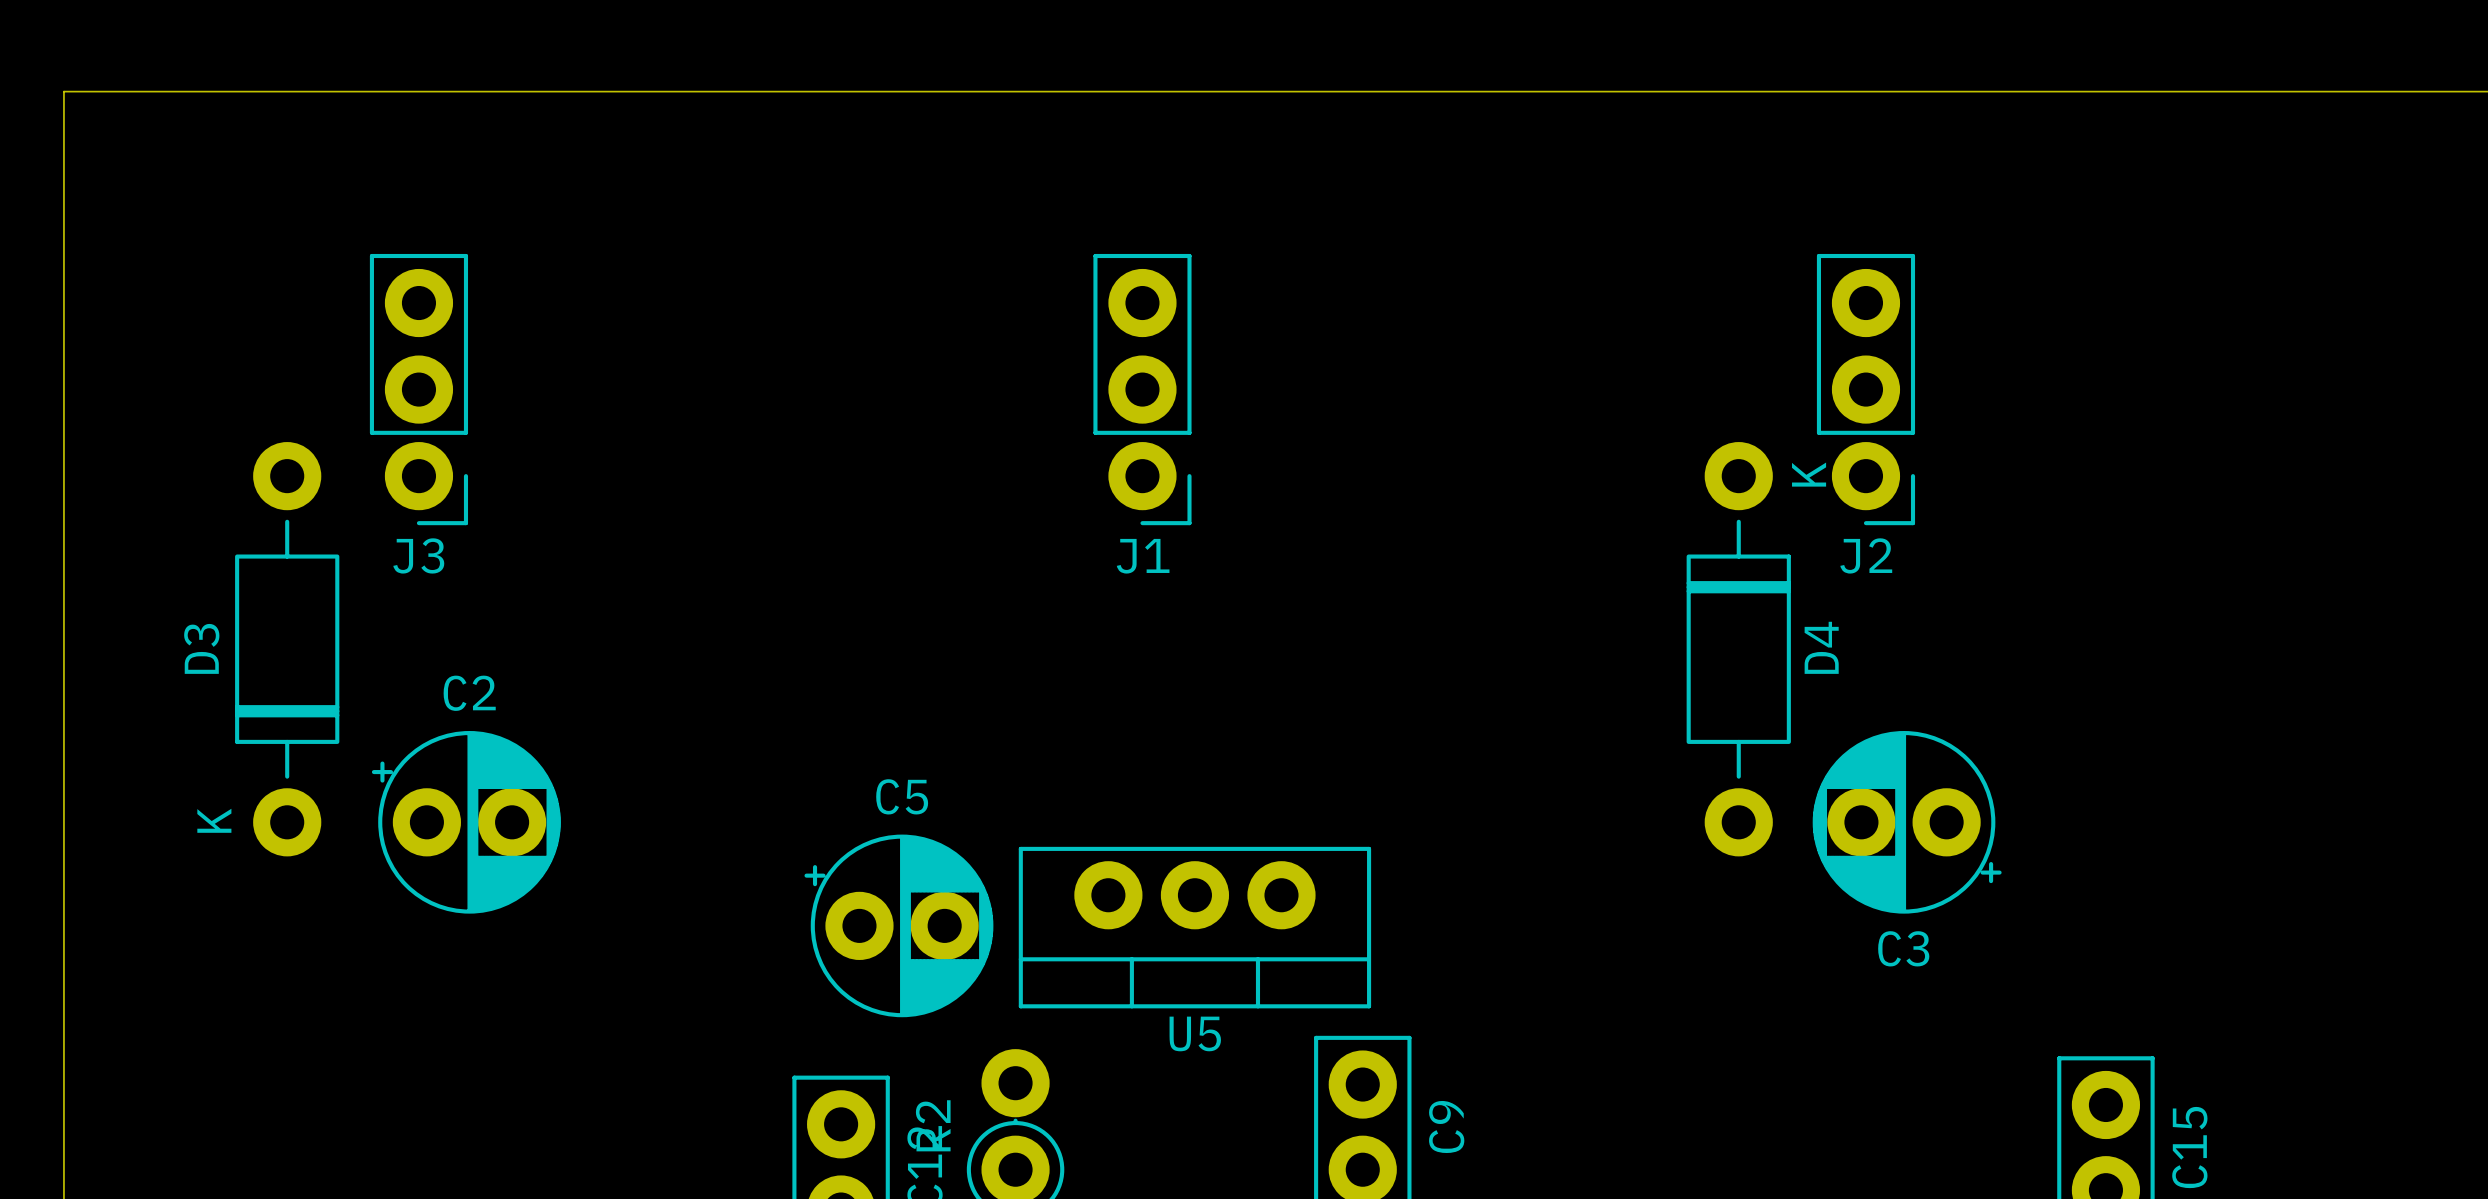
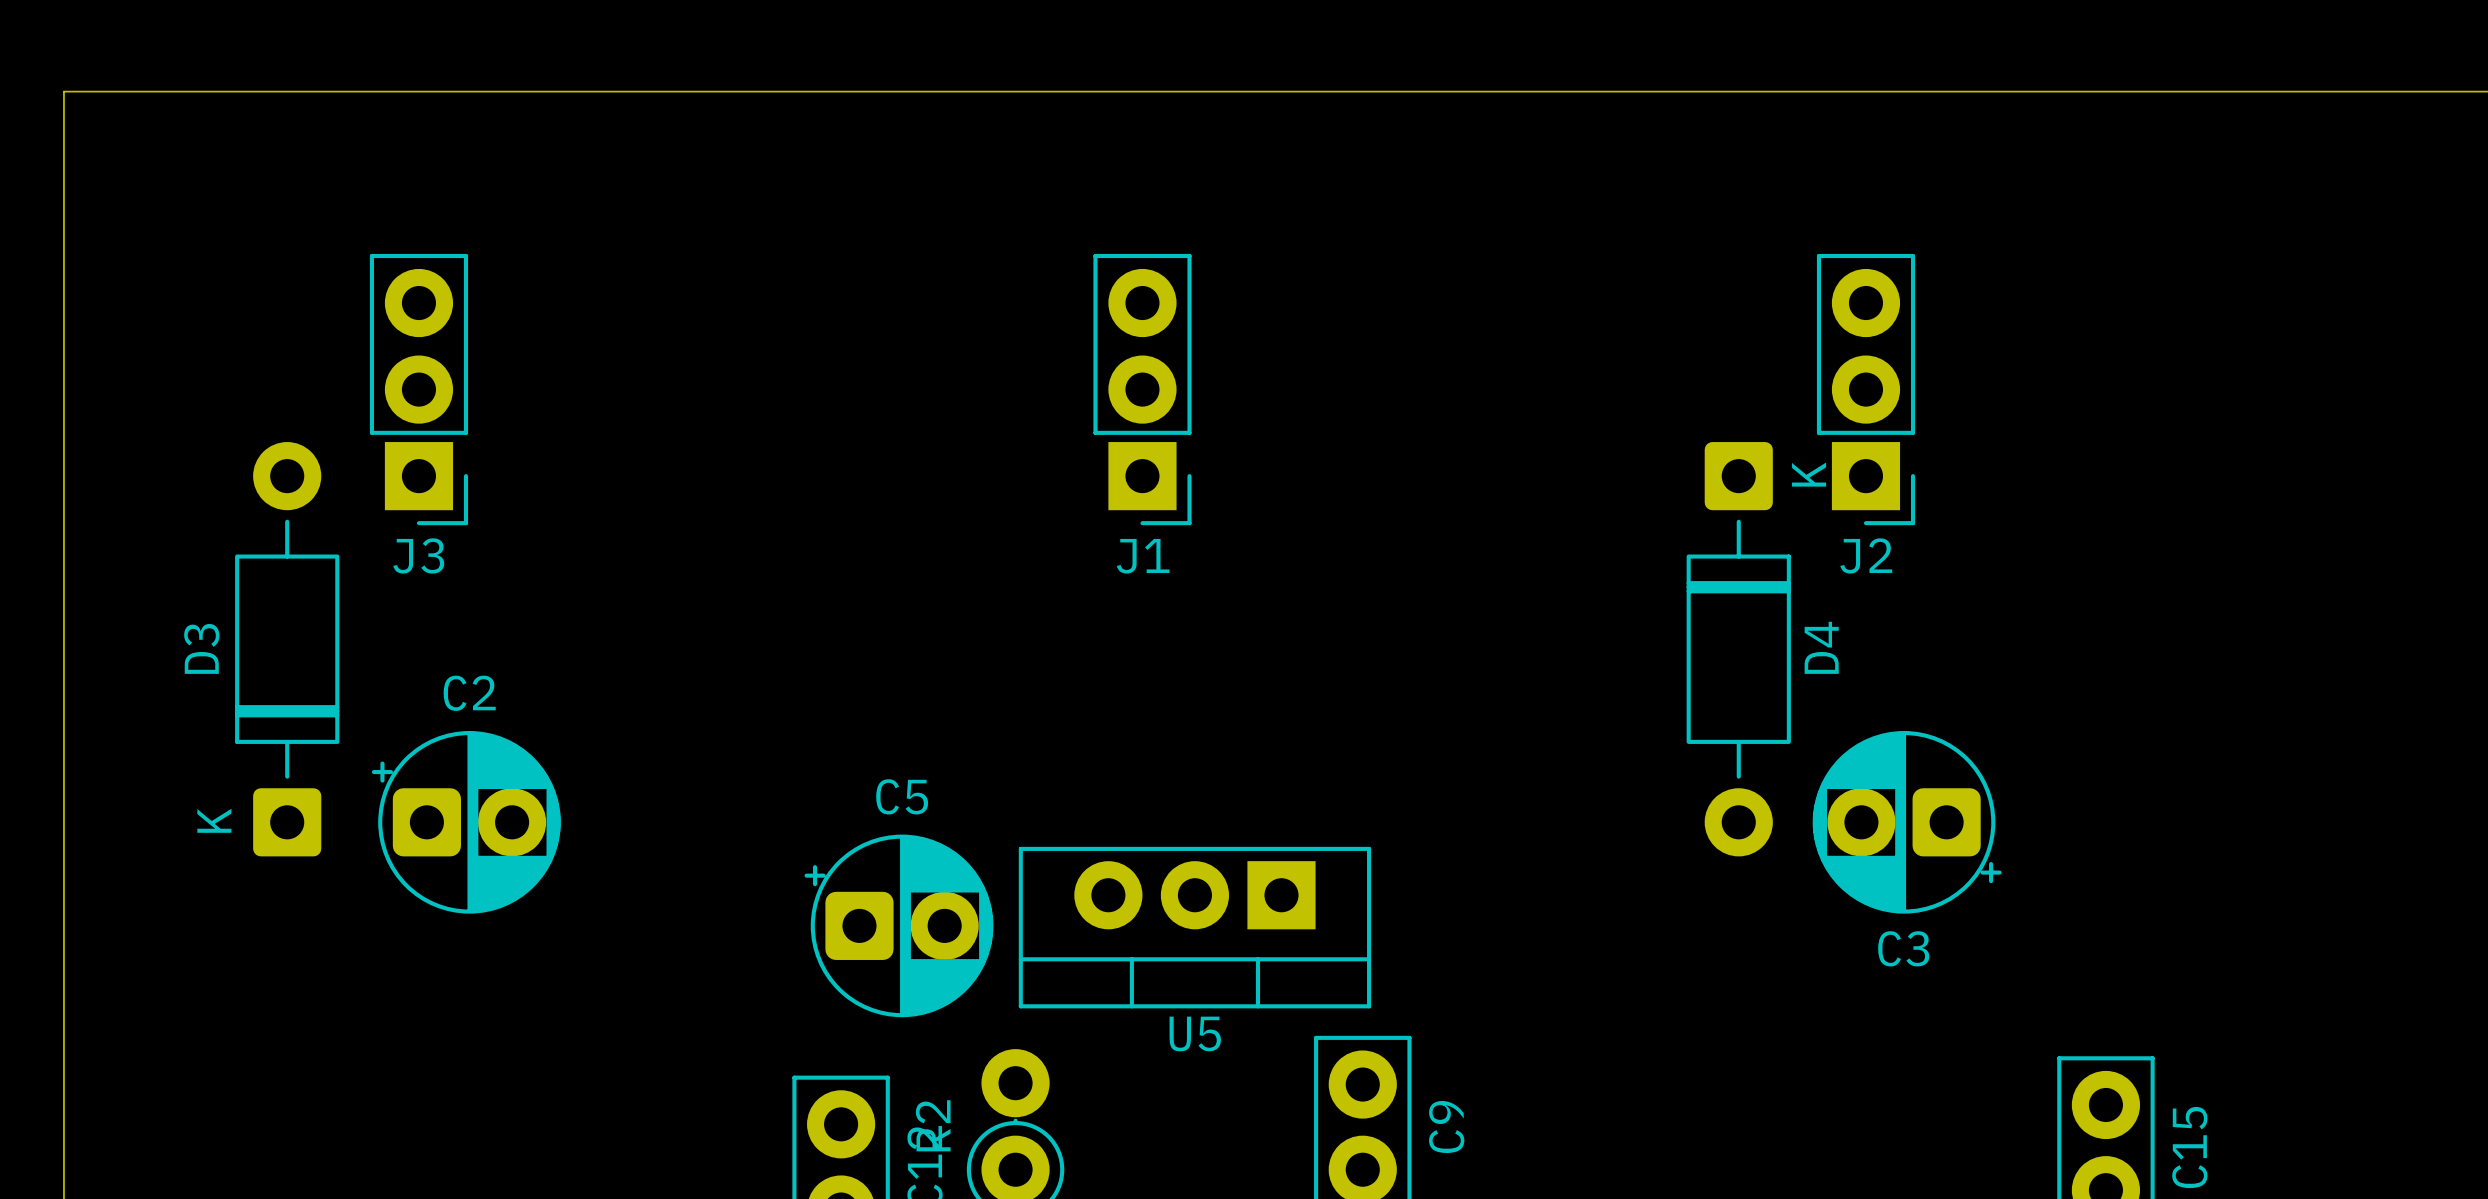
J3 footprint: [369, 253, 469, 526] -> [369, 253, 469, 526]
J1 footprint: [1093, 253, 1192, 526] -> [1093, 253, 1192, 526]
J2 footprint: [1816, 253, 1916, 526] -> [1816, 253, 1916, 526]
D3 footprint: [235, 442, 340, 857] -> [235, 442, 340, 857]
D4 footprint: [1686, 442, 1791, 857] -> [1686, 442, 1791, 857]
C2 footprint: [371, 730, 561, 914] -> [371, 730, 561, 914]
C3 footprint: [1812, 730, 2002, 914] -> [1812, 730, 2002, 914]
C5 footprint: [804, 834, 994, 1018] -> [804, 834, 994, 1018]
U5 footprint: [1018, 846, 1372, 1009] -> [1018, 846, 1372, 1009]

